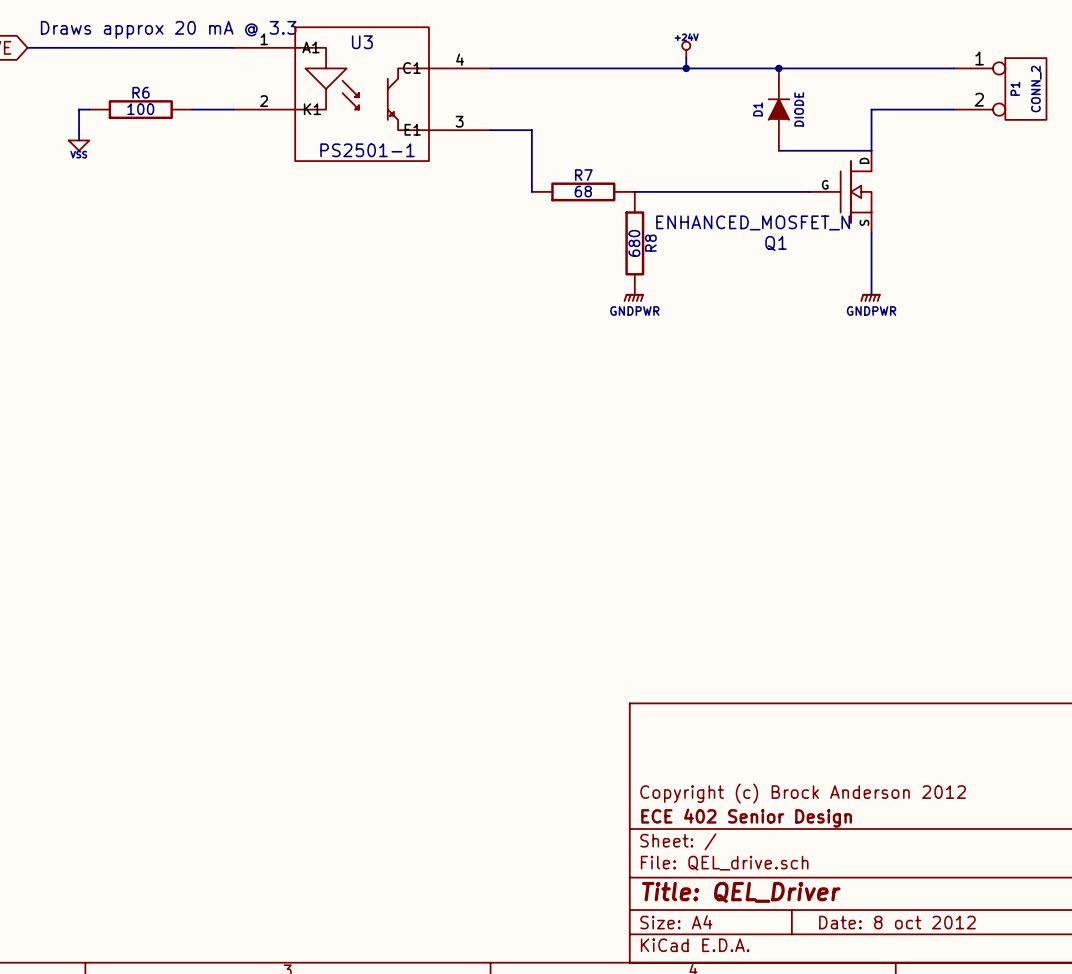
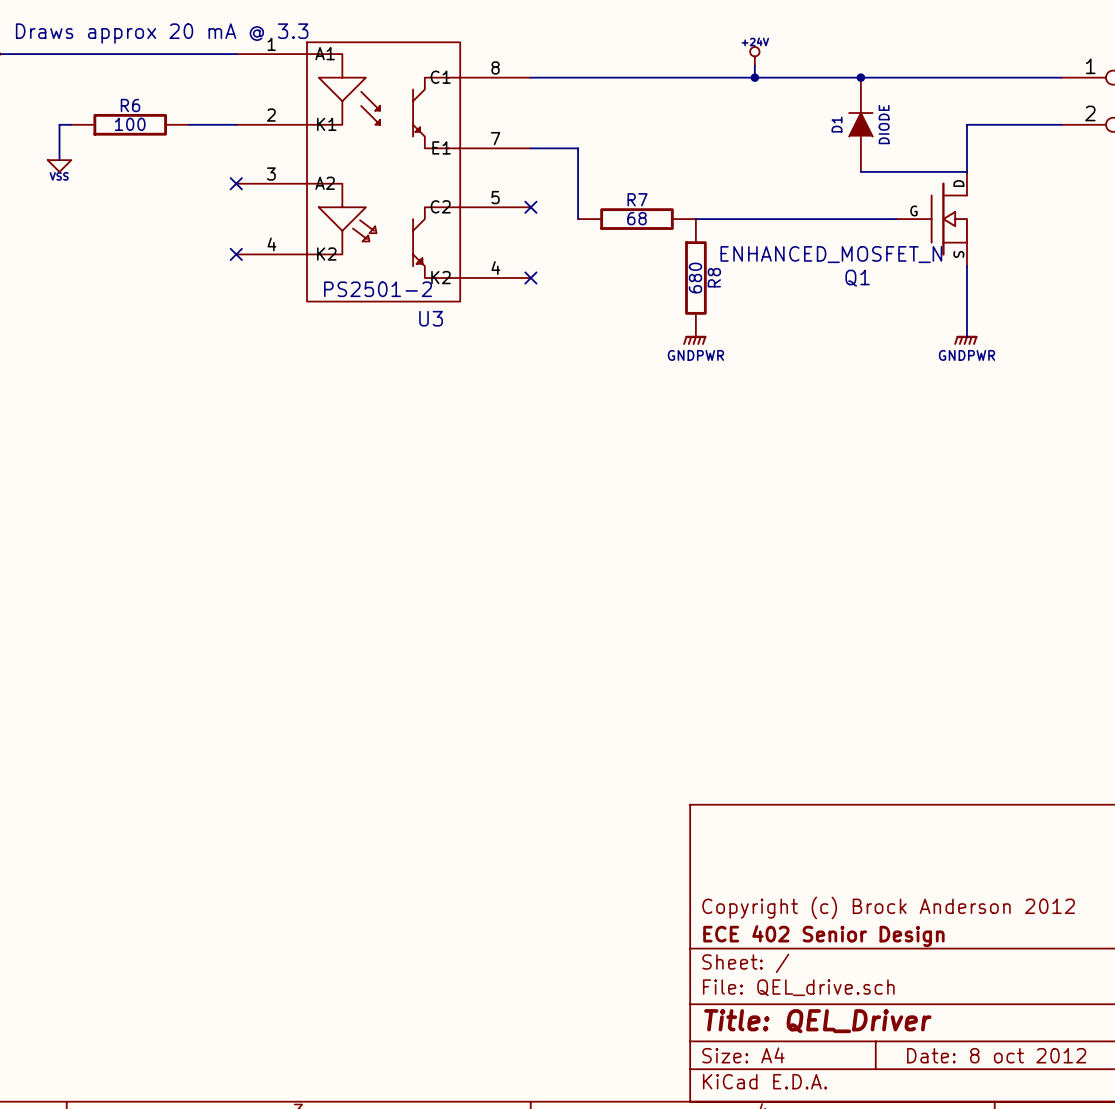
U3 symbol: [233, 27, 491, 162] -> [236, 42, 531, 302]
U3 name position: U3 (362, 42) -> U3 (431, 318)
U3 value: PS2501-1 (367, 150) -> PS2501-2 (378, 289)
no-connect mark: none -> (236, 183)
no-connect mark: none -> (530, 207)
no-connect mark: none -> (236, 254)
no-connect mark: none -> (530, 278)

